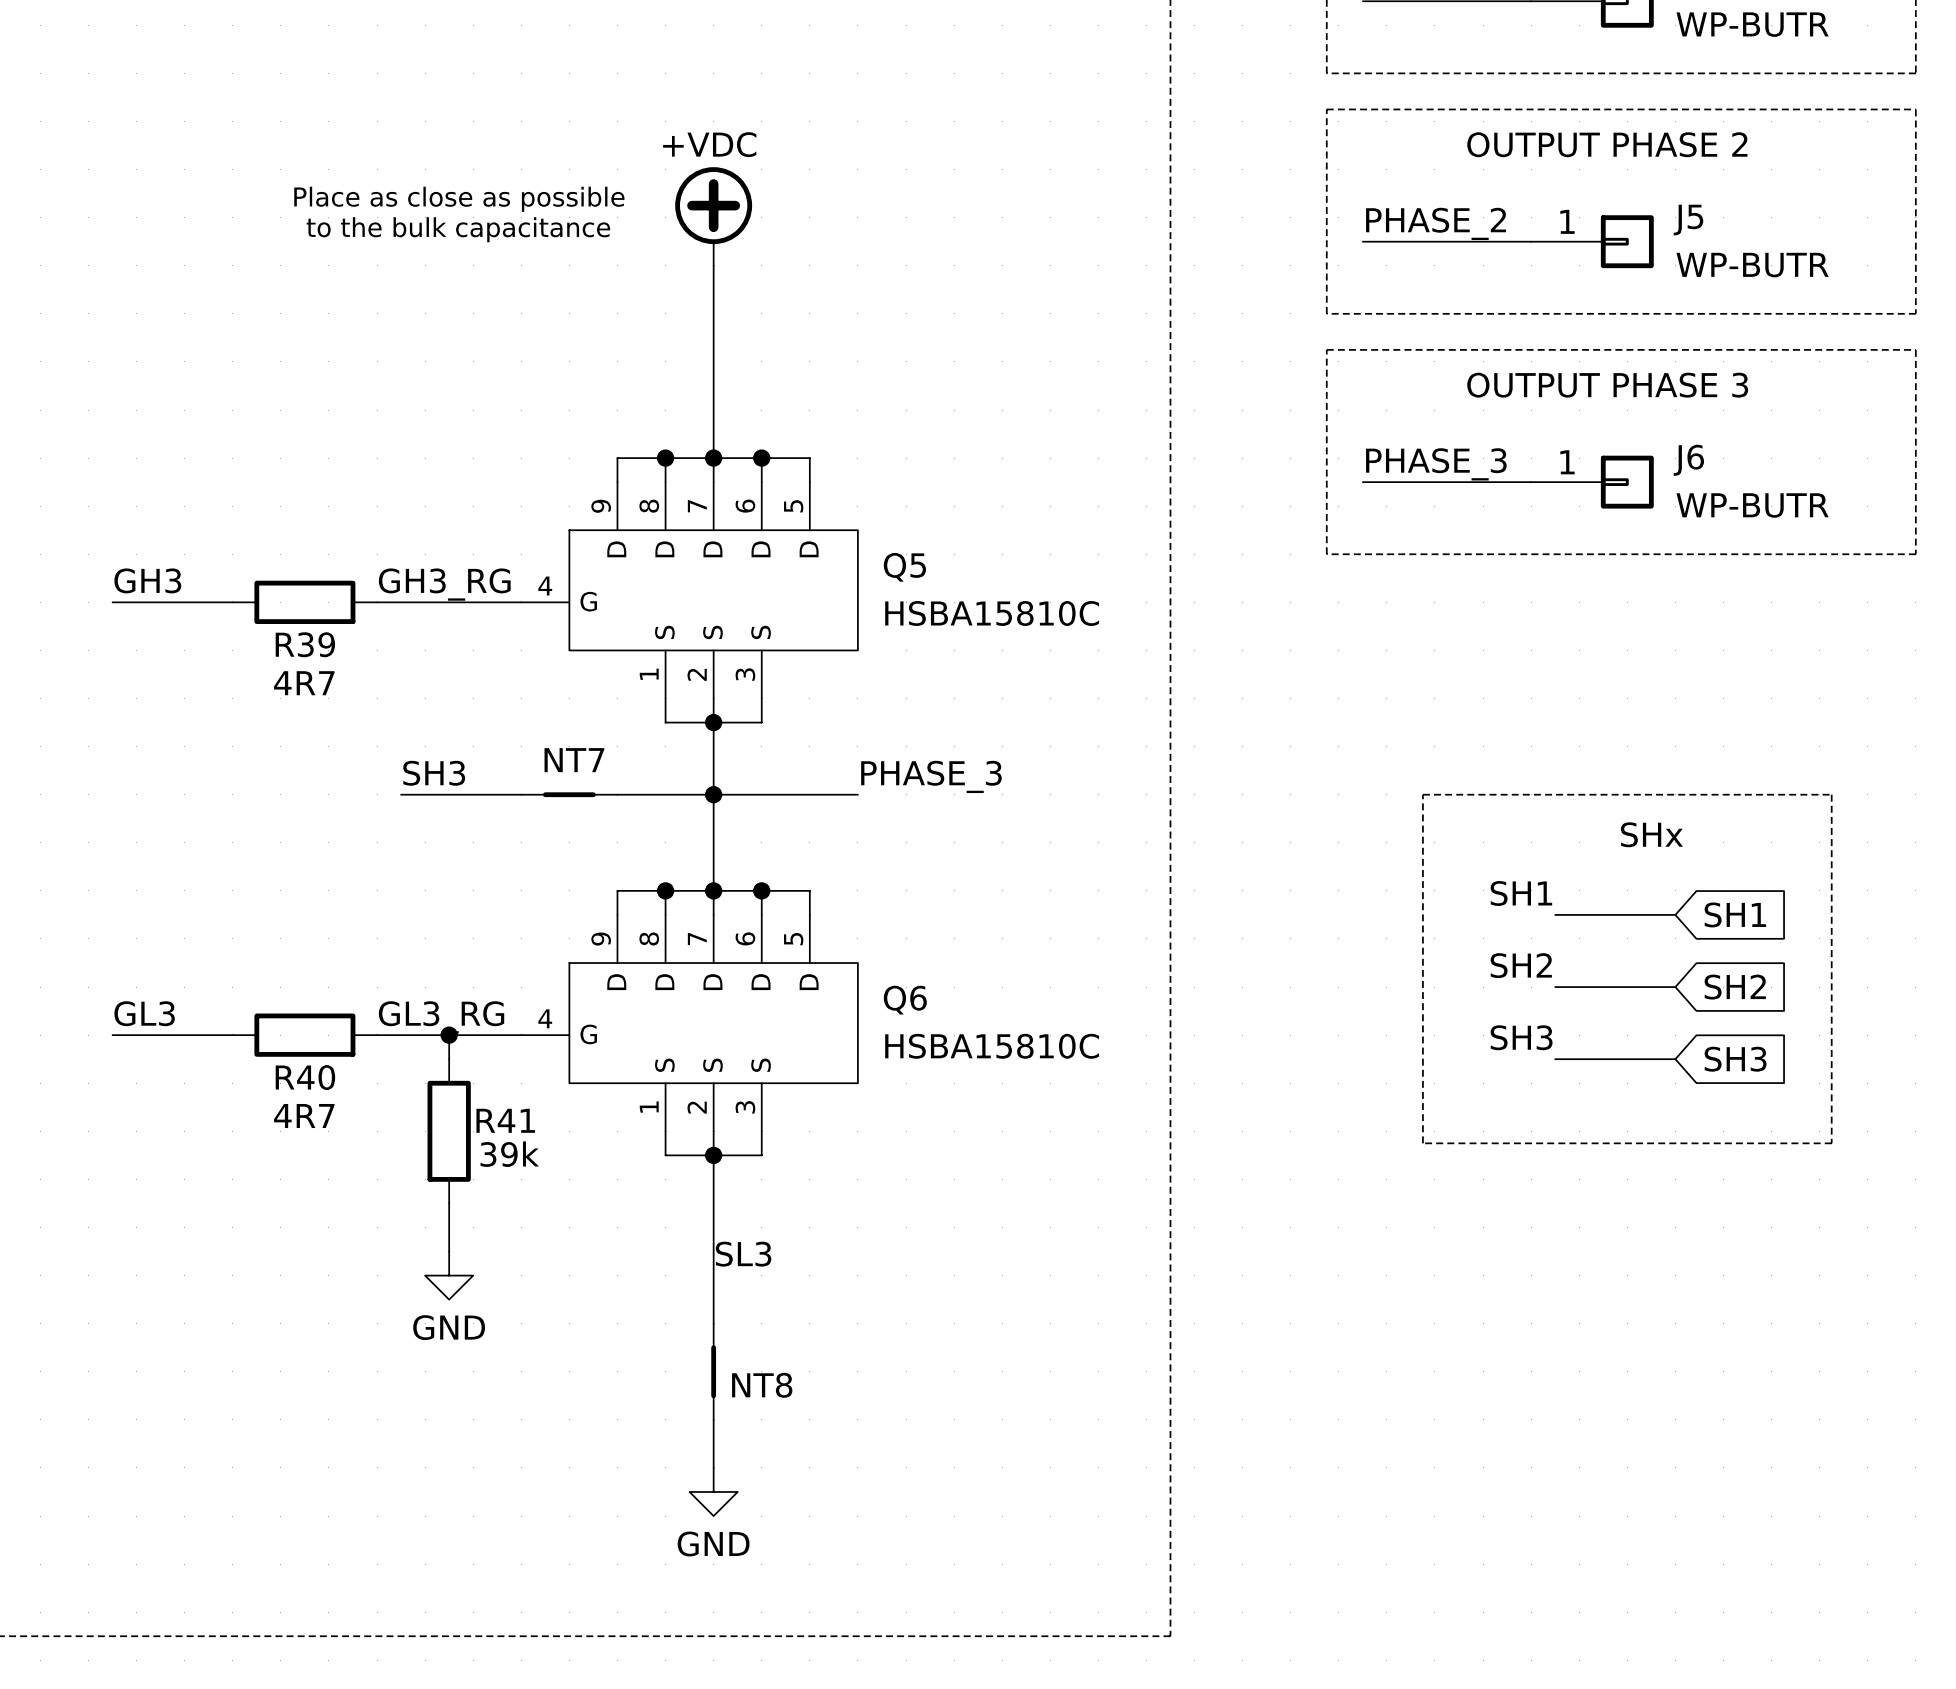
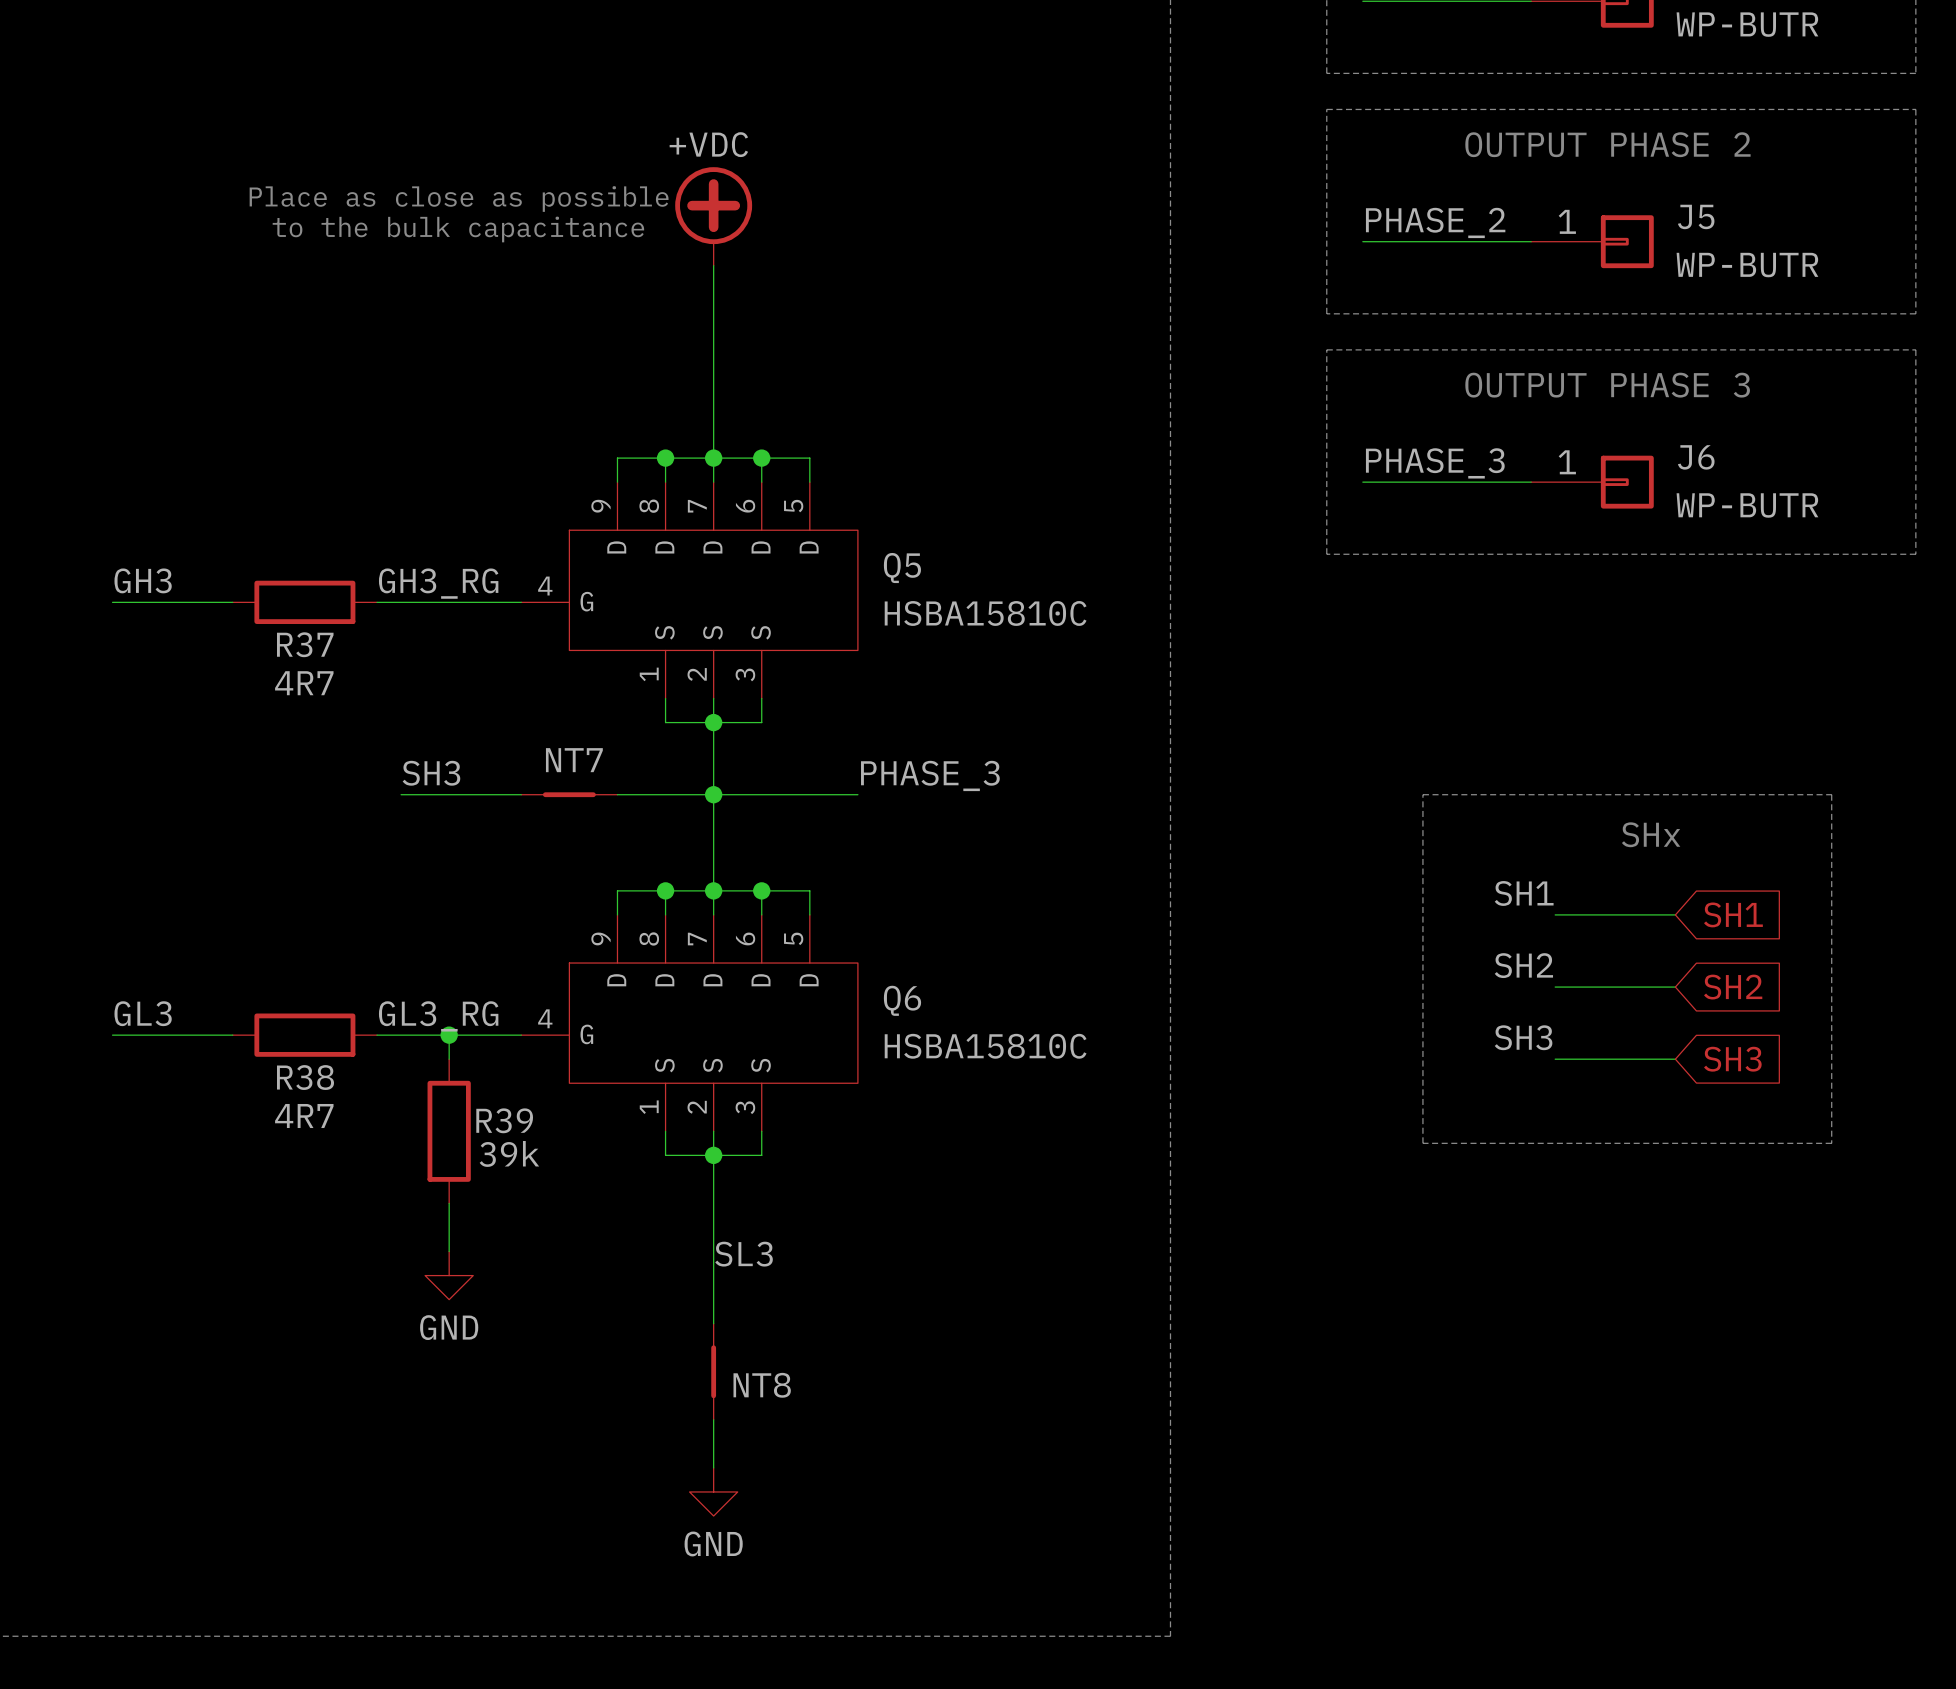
R39 name: R39 (305, 644) -> R37 (305, 644)
R40 name: R40 (305, 1077) -> R38 (305, 1077)
R41 name: R41 (505, 1120) -> R39 (504, 1120)

